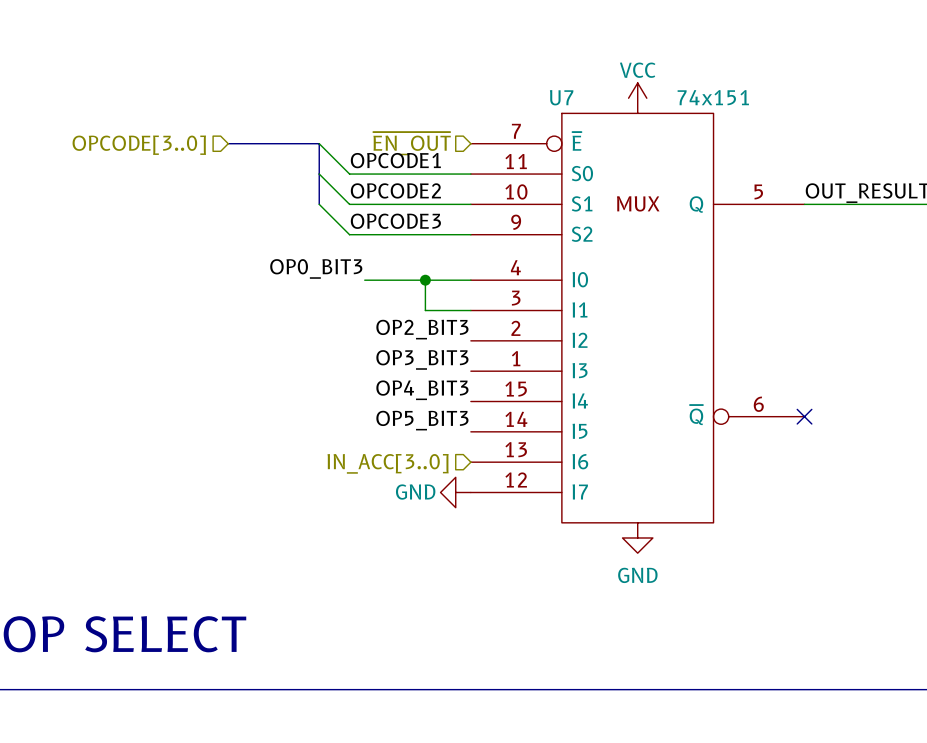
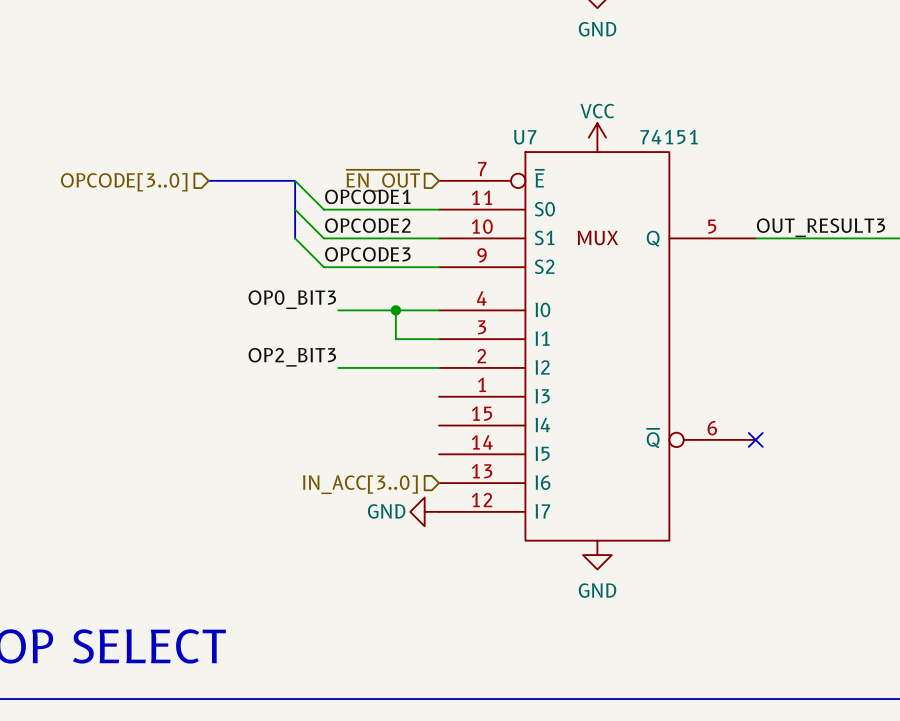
U7 value: 74x151 (713, 97) -> 74151 (669, 137)
label position: OP2_BIT3 (422, 329) -> OP2_BIT3 (292, 357)
wire: none -> (338, 367) (439, 367)
label: OP3_BIT3 (422, 359) -> none
label: OP4_BIT3 (422, 390) -> none
label: OP5_BIT3 (422, 420) -> none

